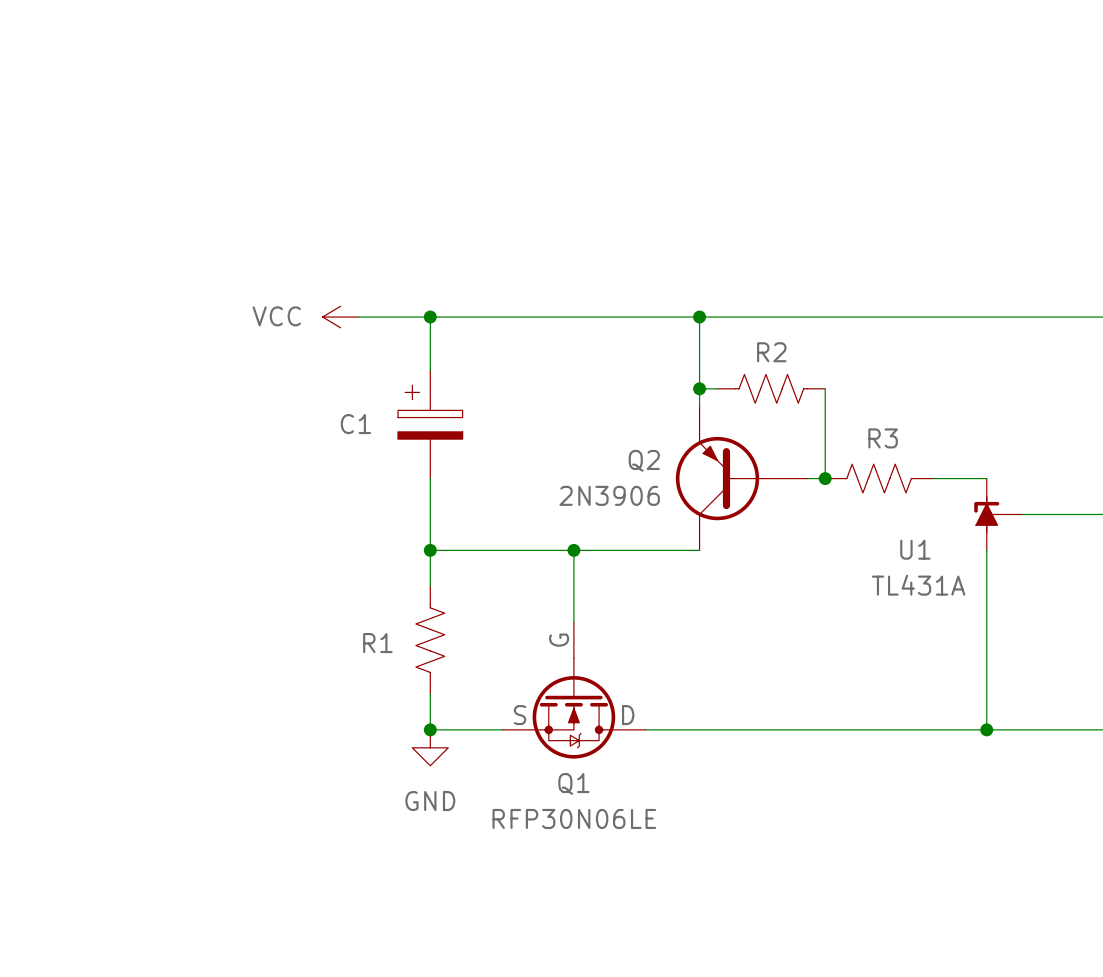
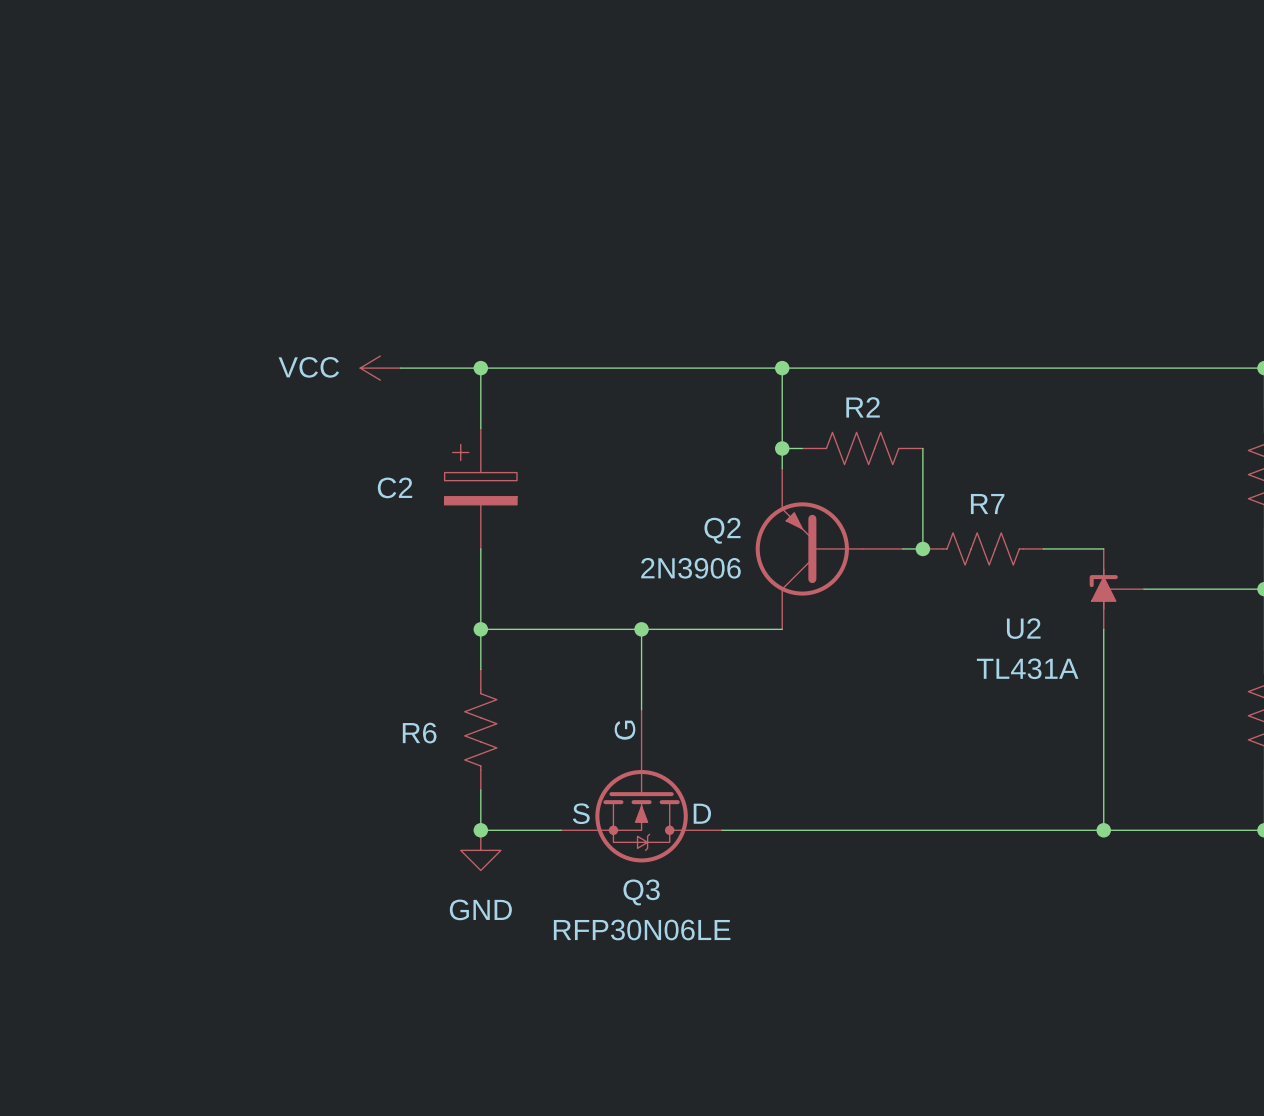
C1 name: C1 (355, 424) -> C2 (394, 487)
R3 name: R3 (883, 438) -> R7 (987, 504)
U1 name: U1 (915, 549) -> U2 (1023, 628)
R1 name: R1 (377, 643) -> R6 (419, 733)
Q1 name: Q1 (573, 783) -> Q3 (641, 892)

